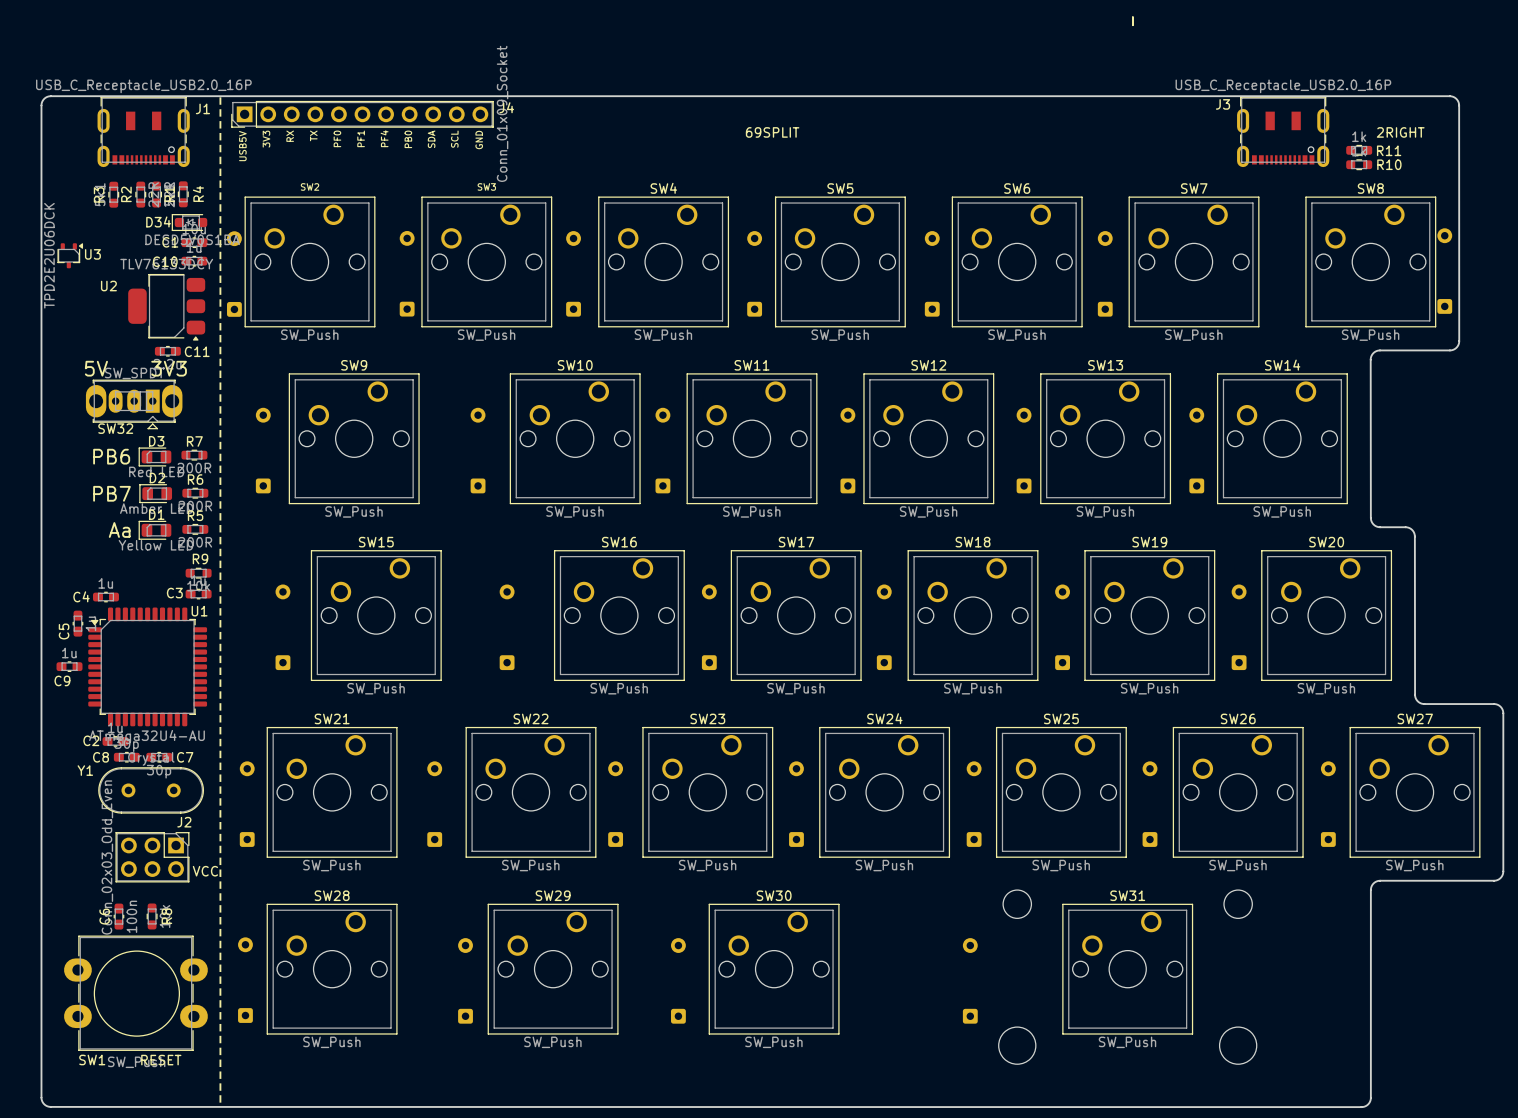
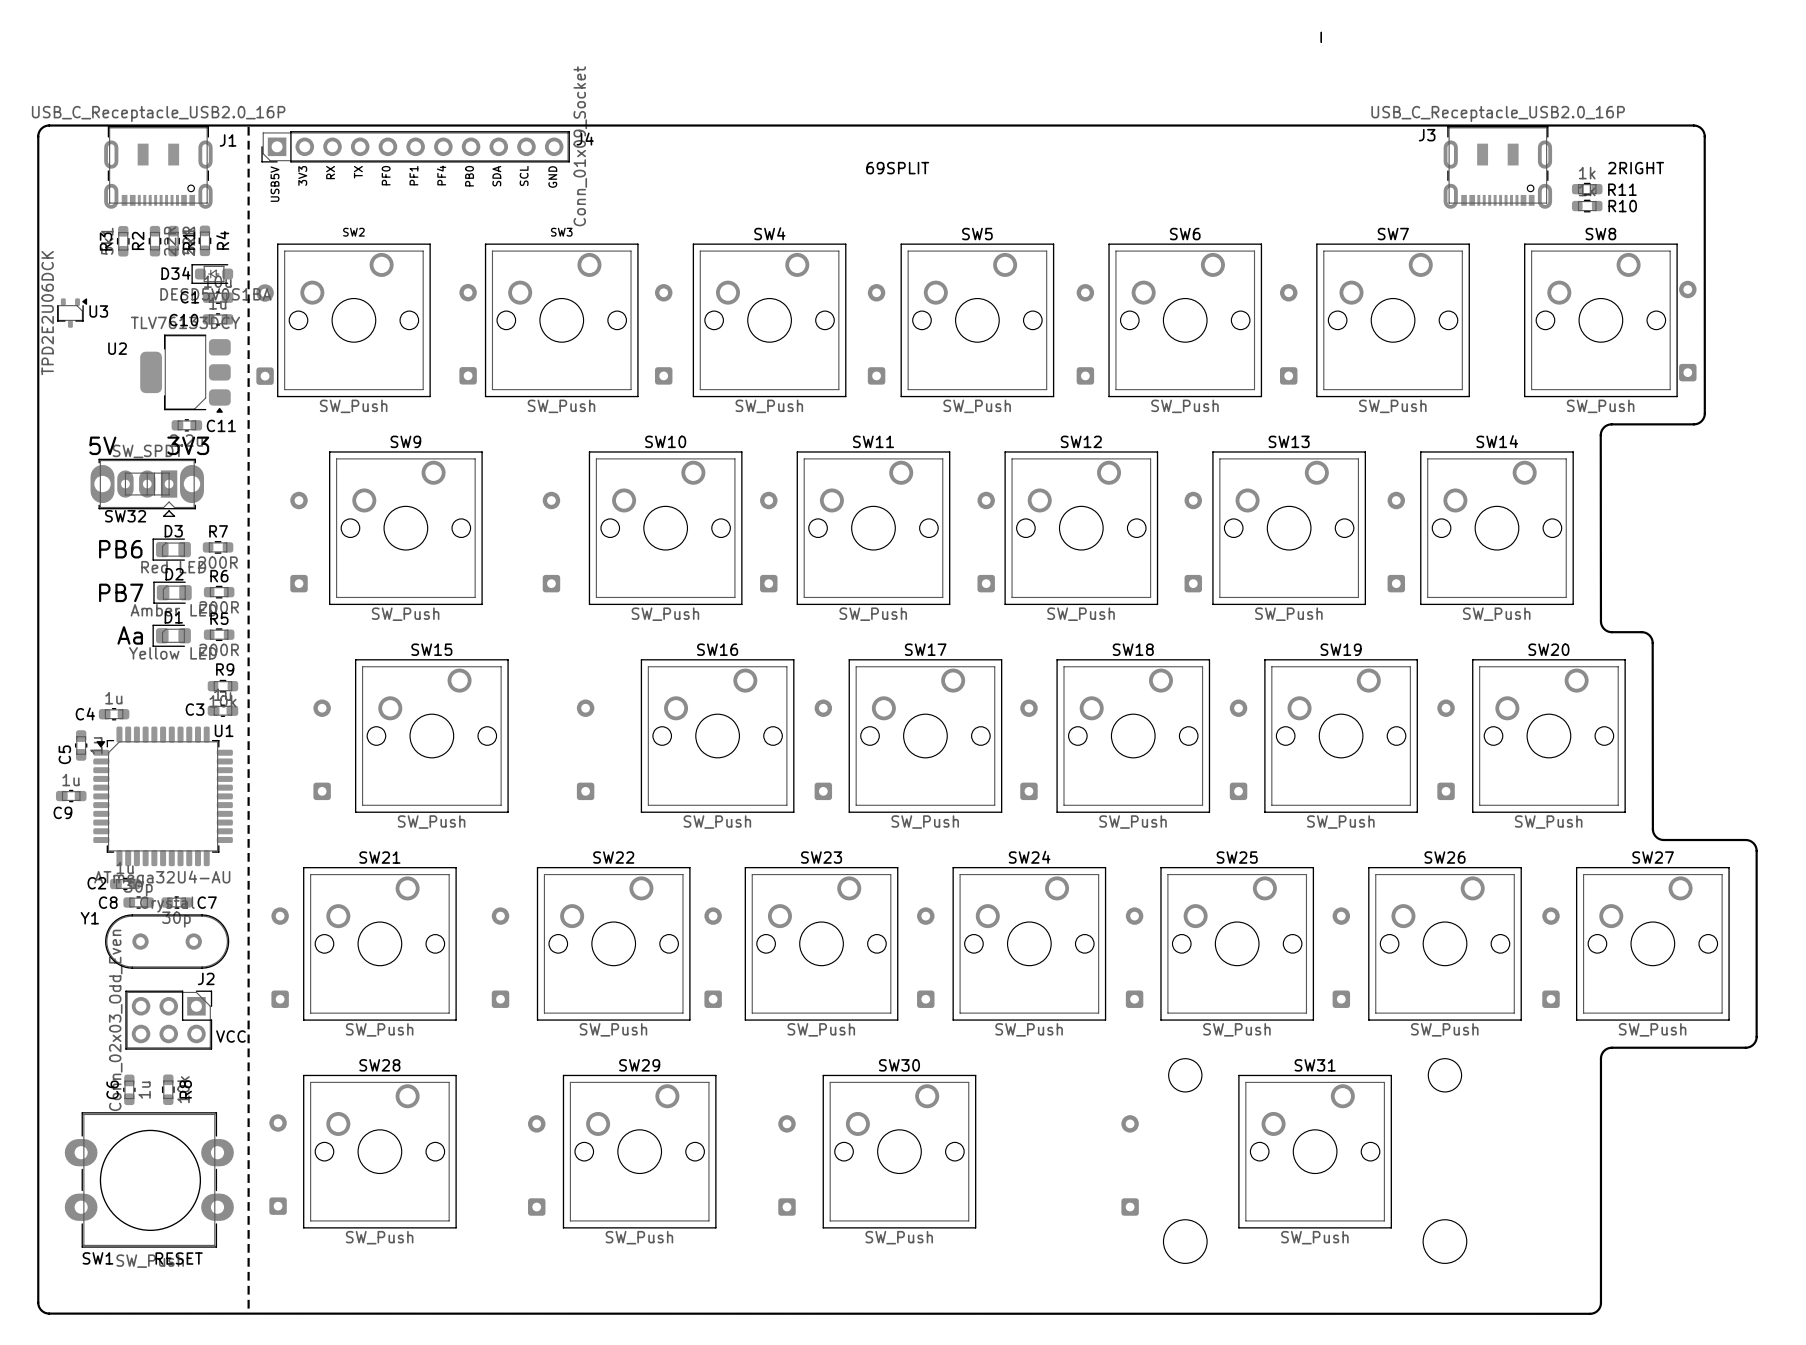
C6 value: 100n (131, 916) -> 1u (144, 1090)

